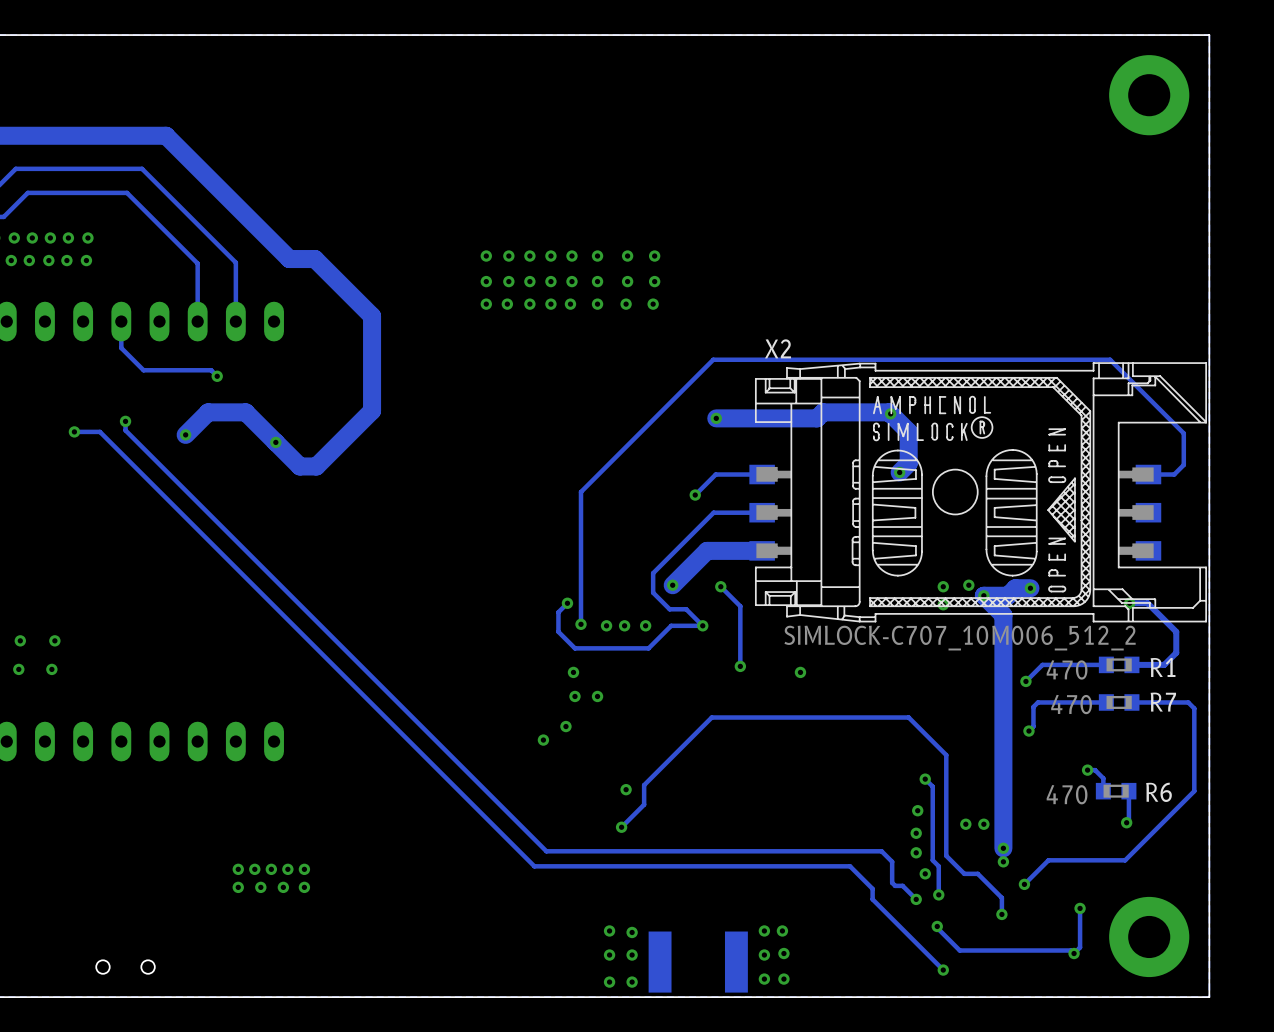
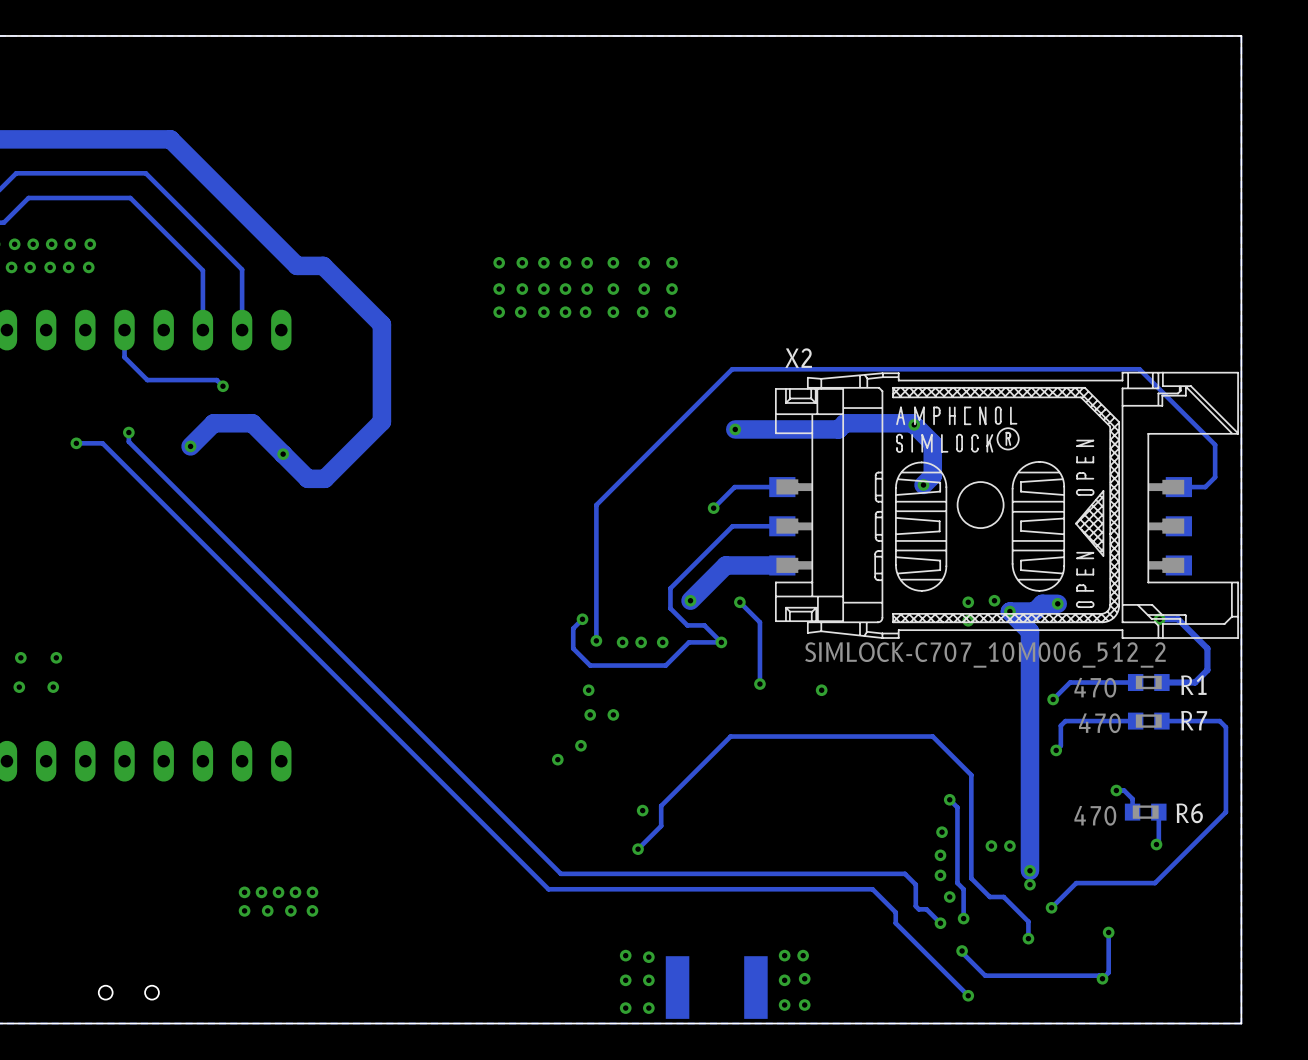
part: (1149, 95) -> none
part: (1149, 936) -> none

